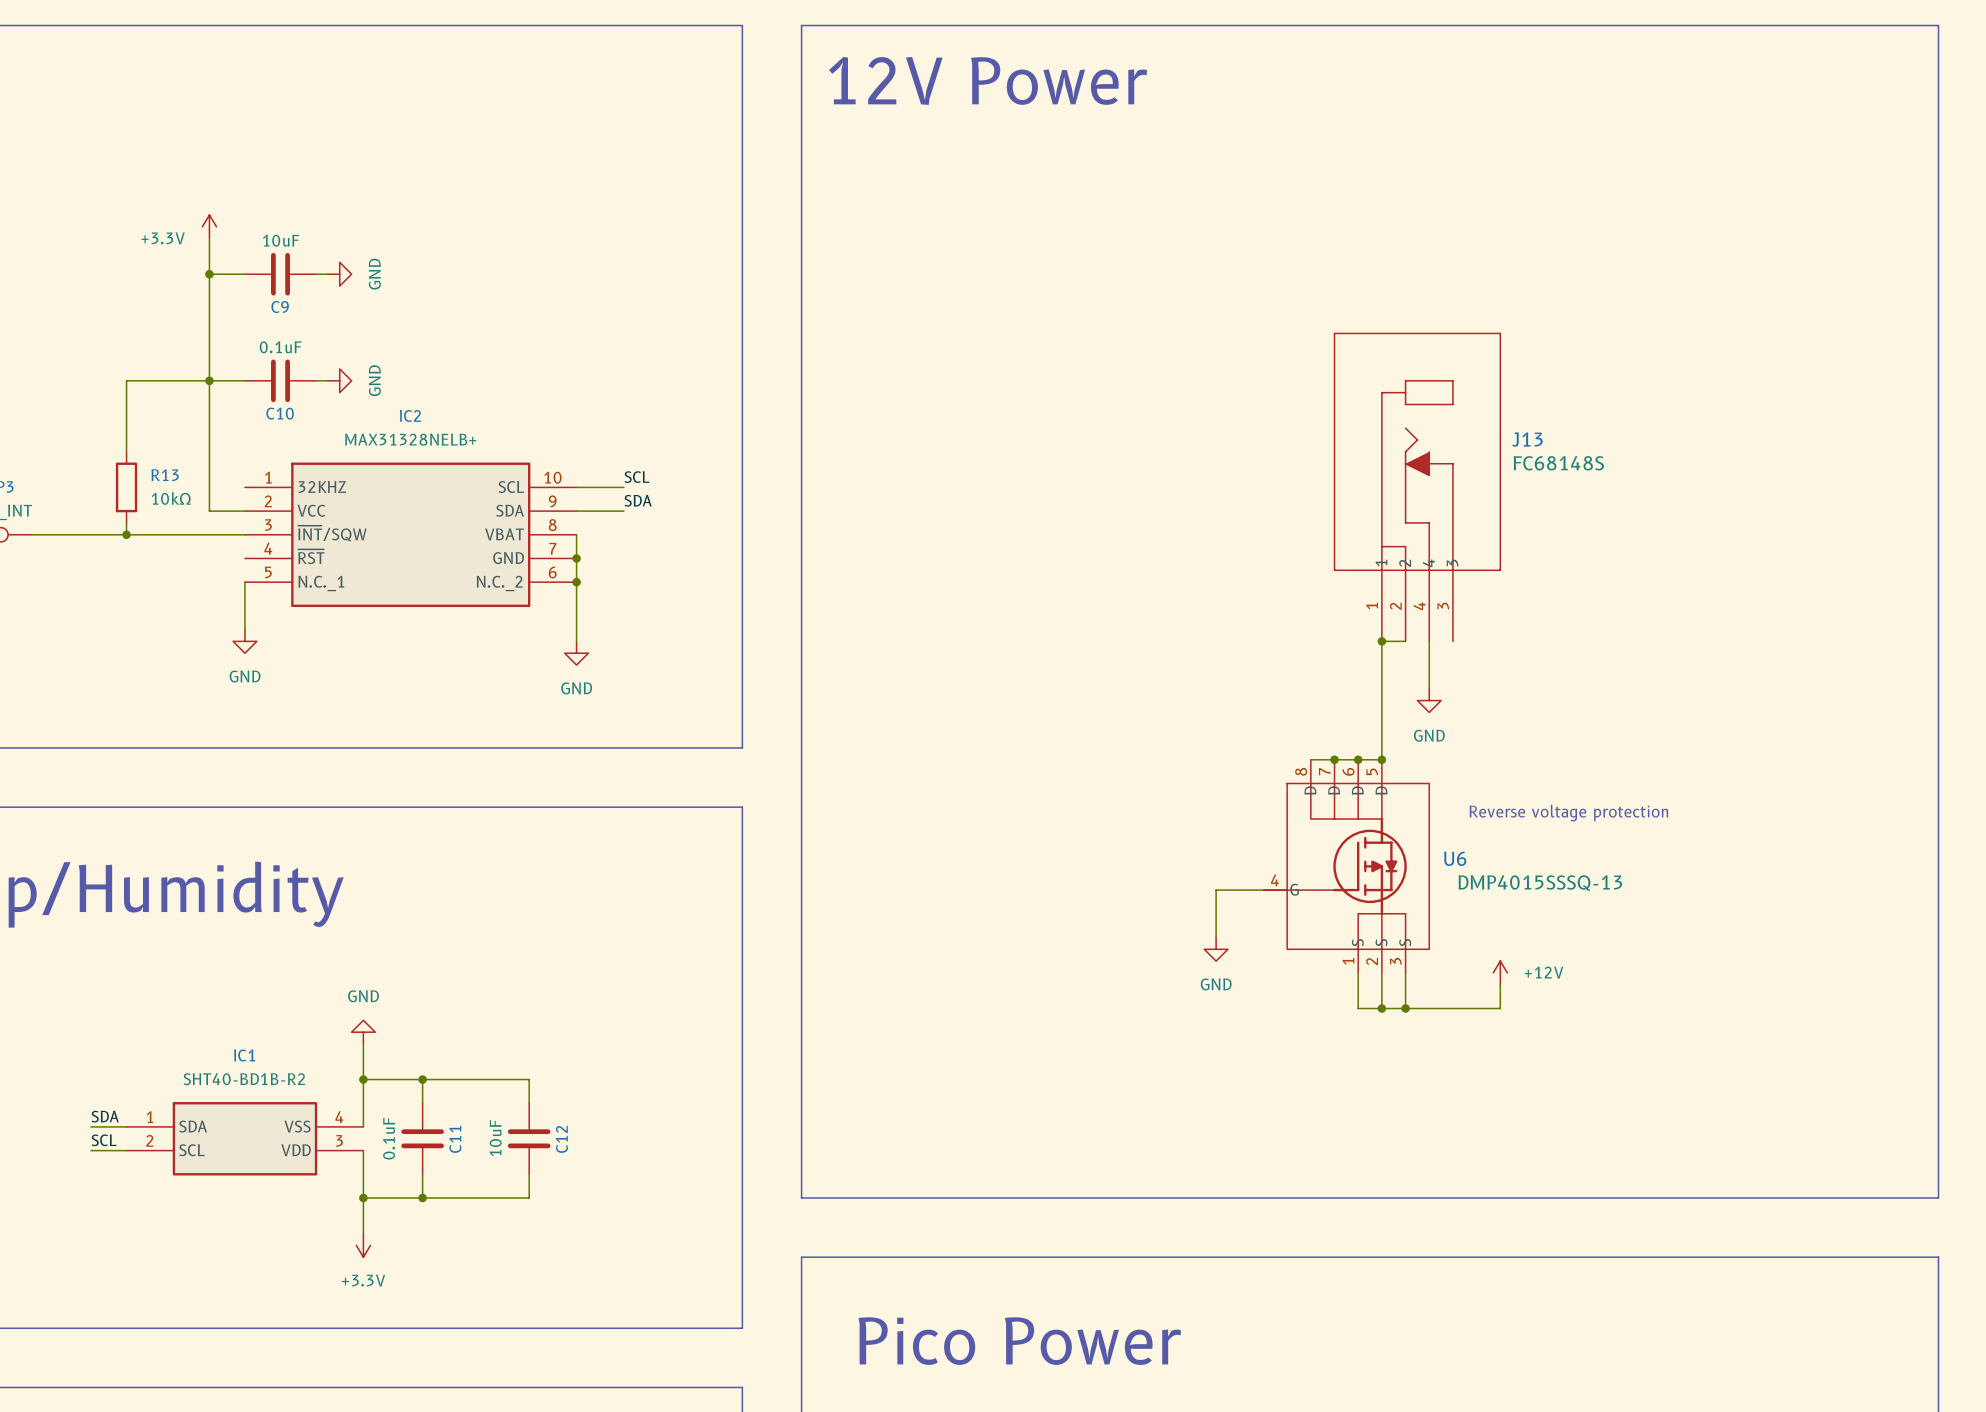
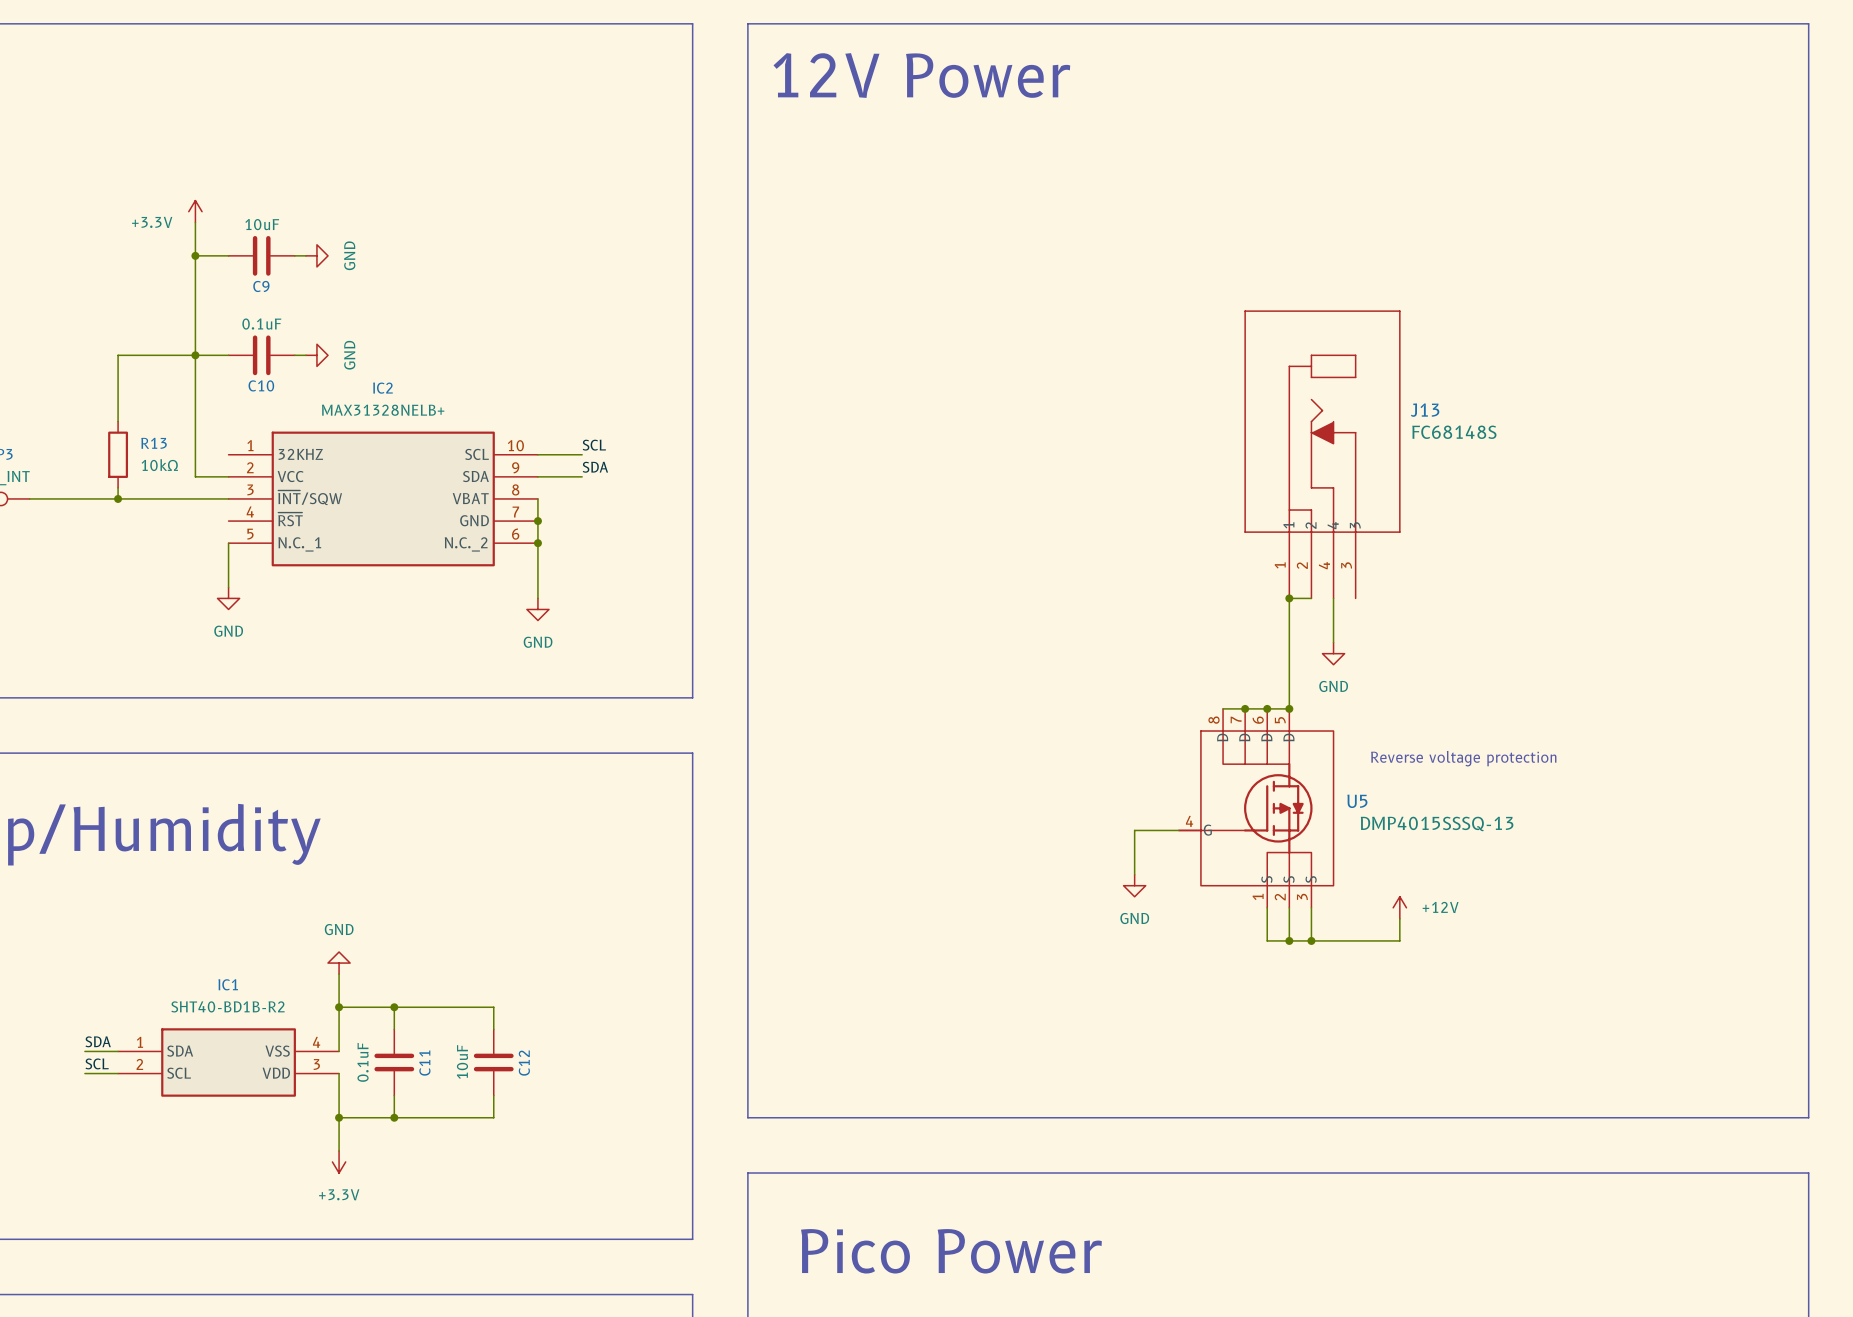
U6 name: U6 (1455, 858) -> U5 (1357, 801)

